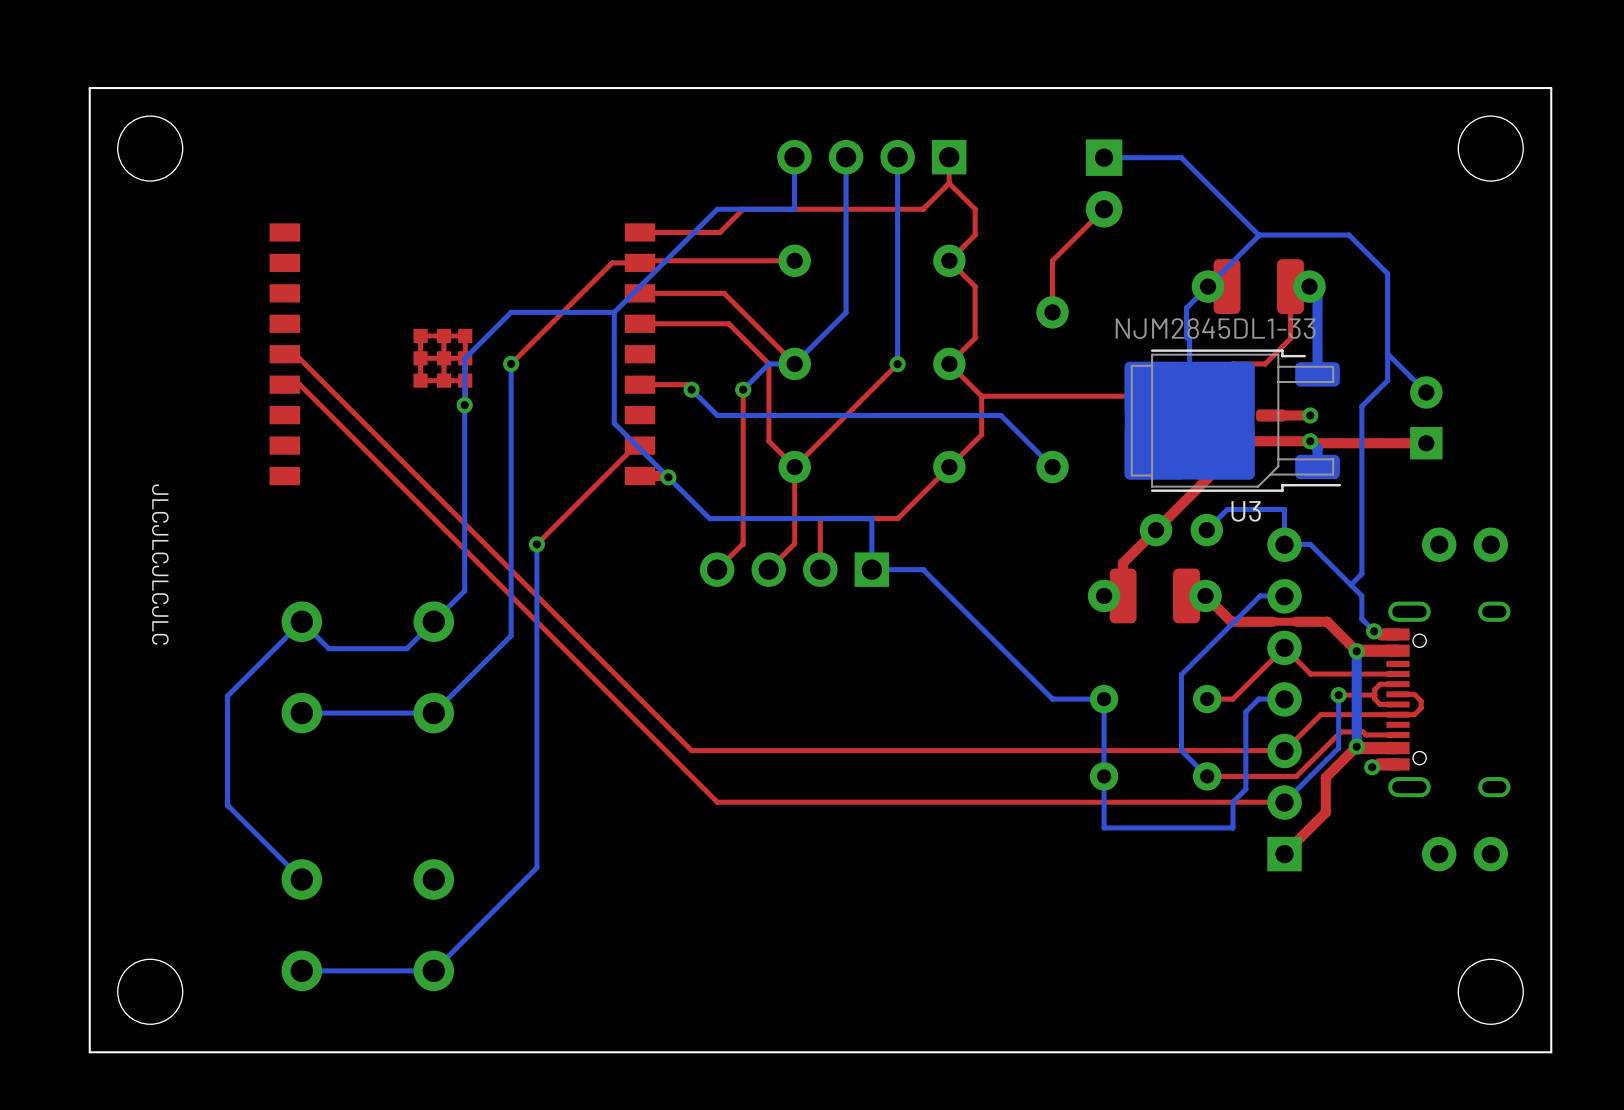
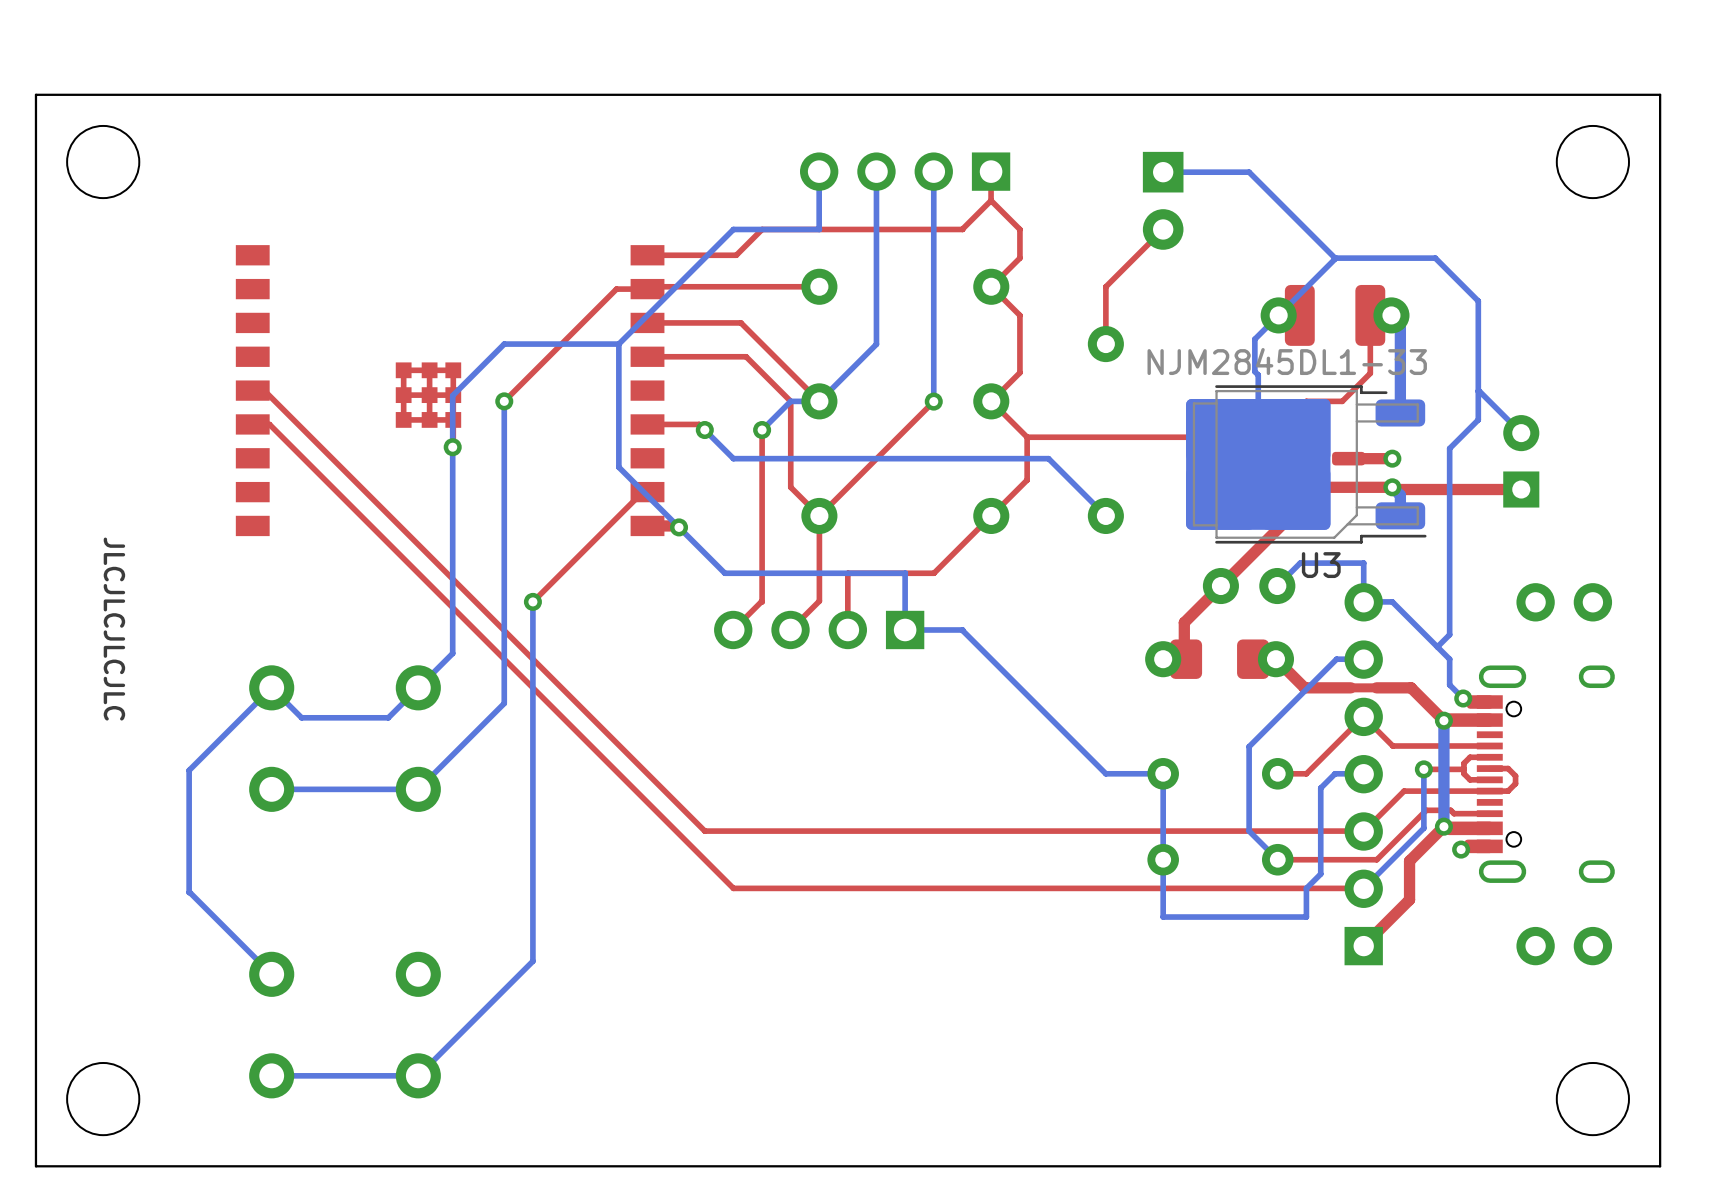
part footprint: [1109, 568, 1200, 624] -> [1169, 639, 1270, 679]

